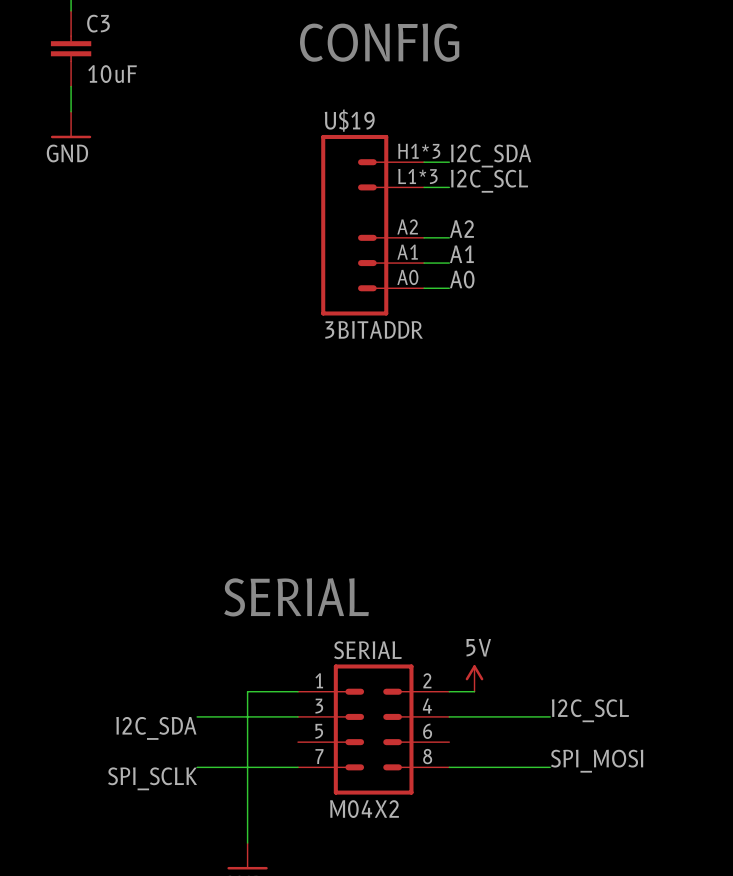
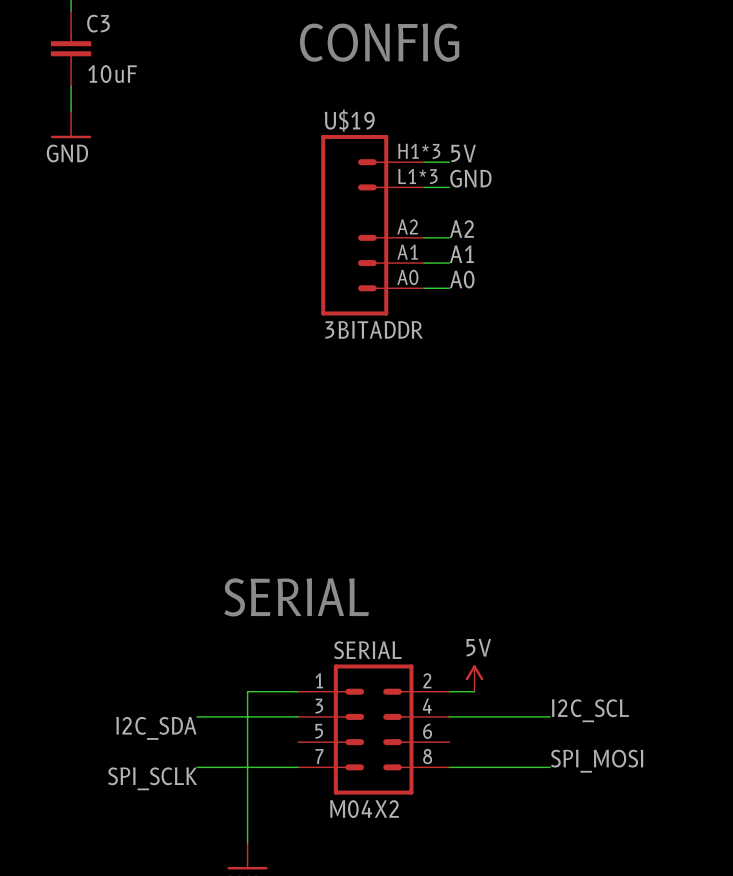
label: I2C_SDA (491, 156) -> 5V (463, 153)
label: I2C_SCL (489, 181) -> GND (470, 178)

